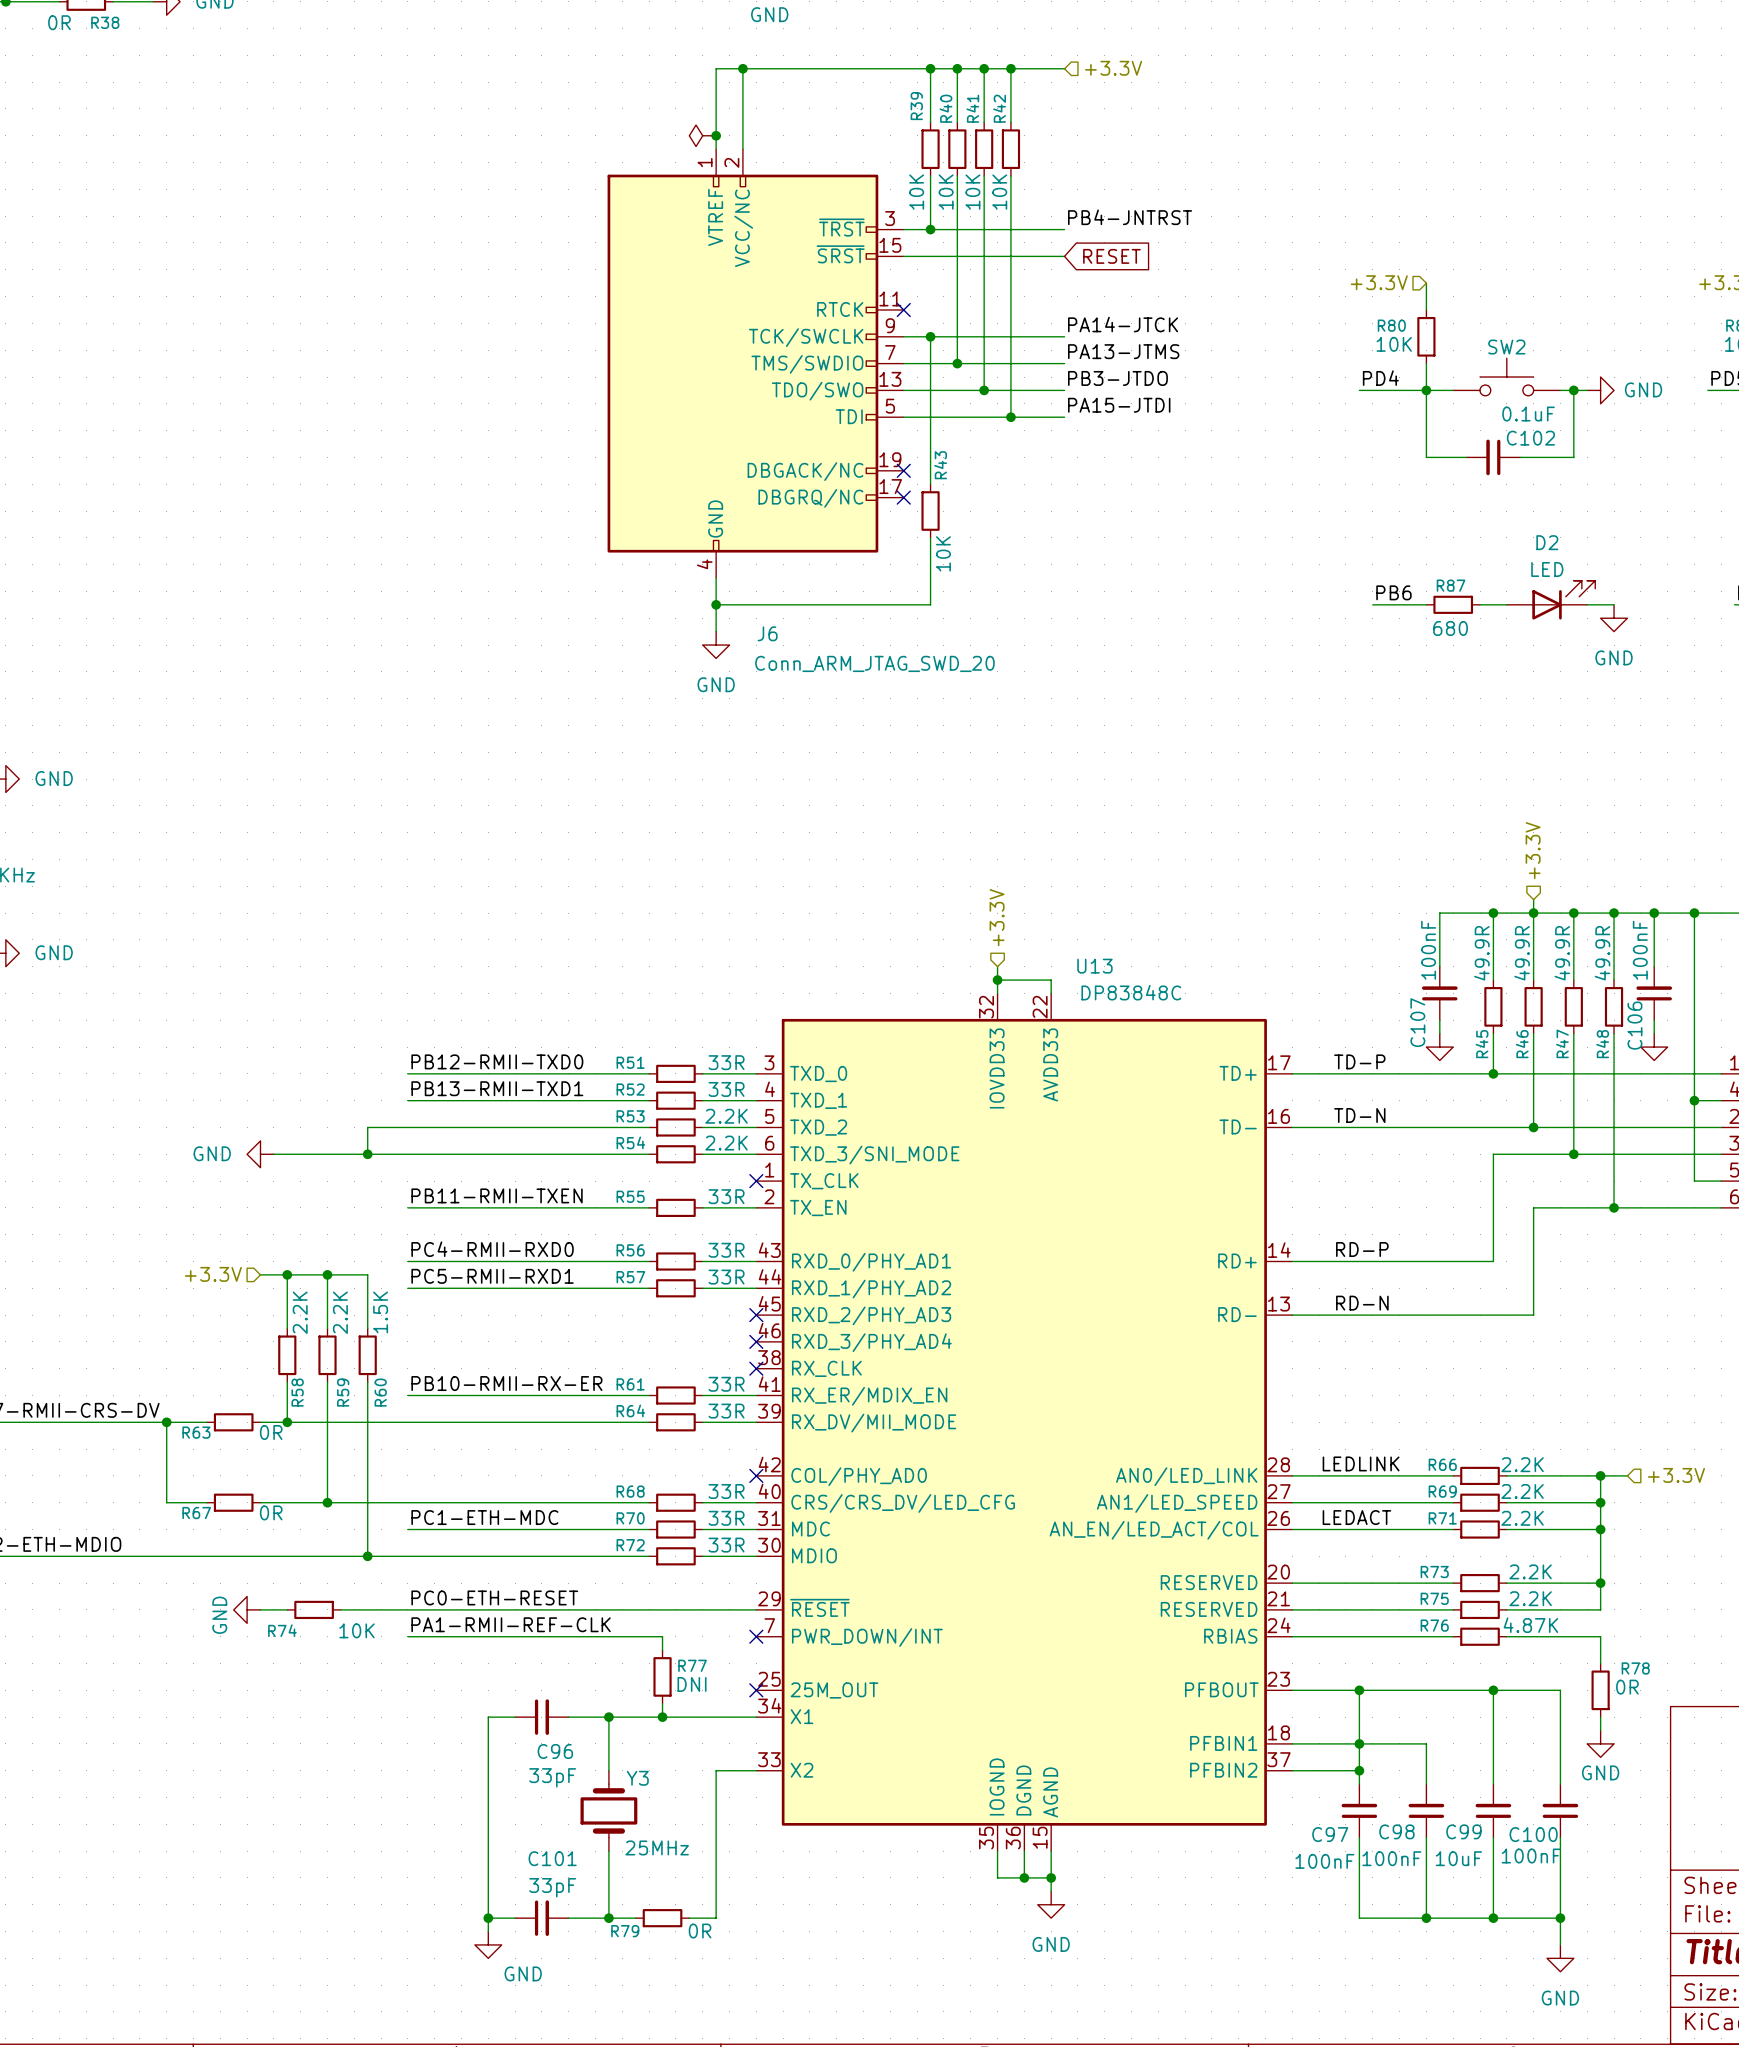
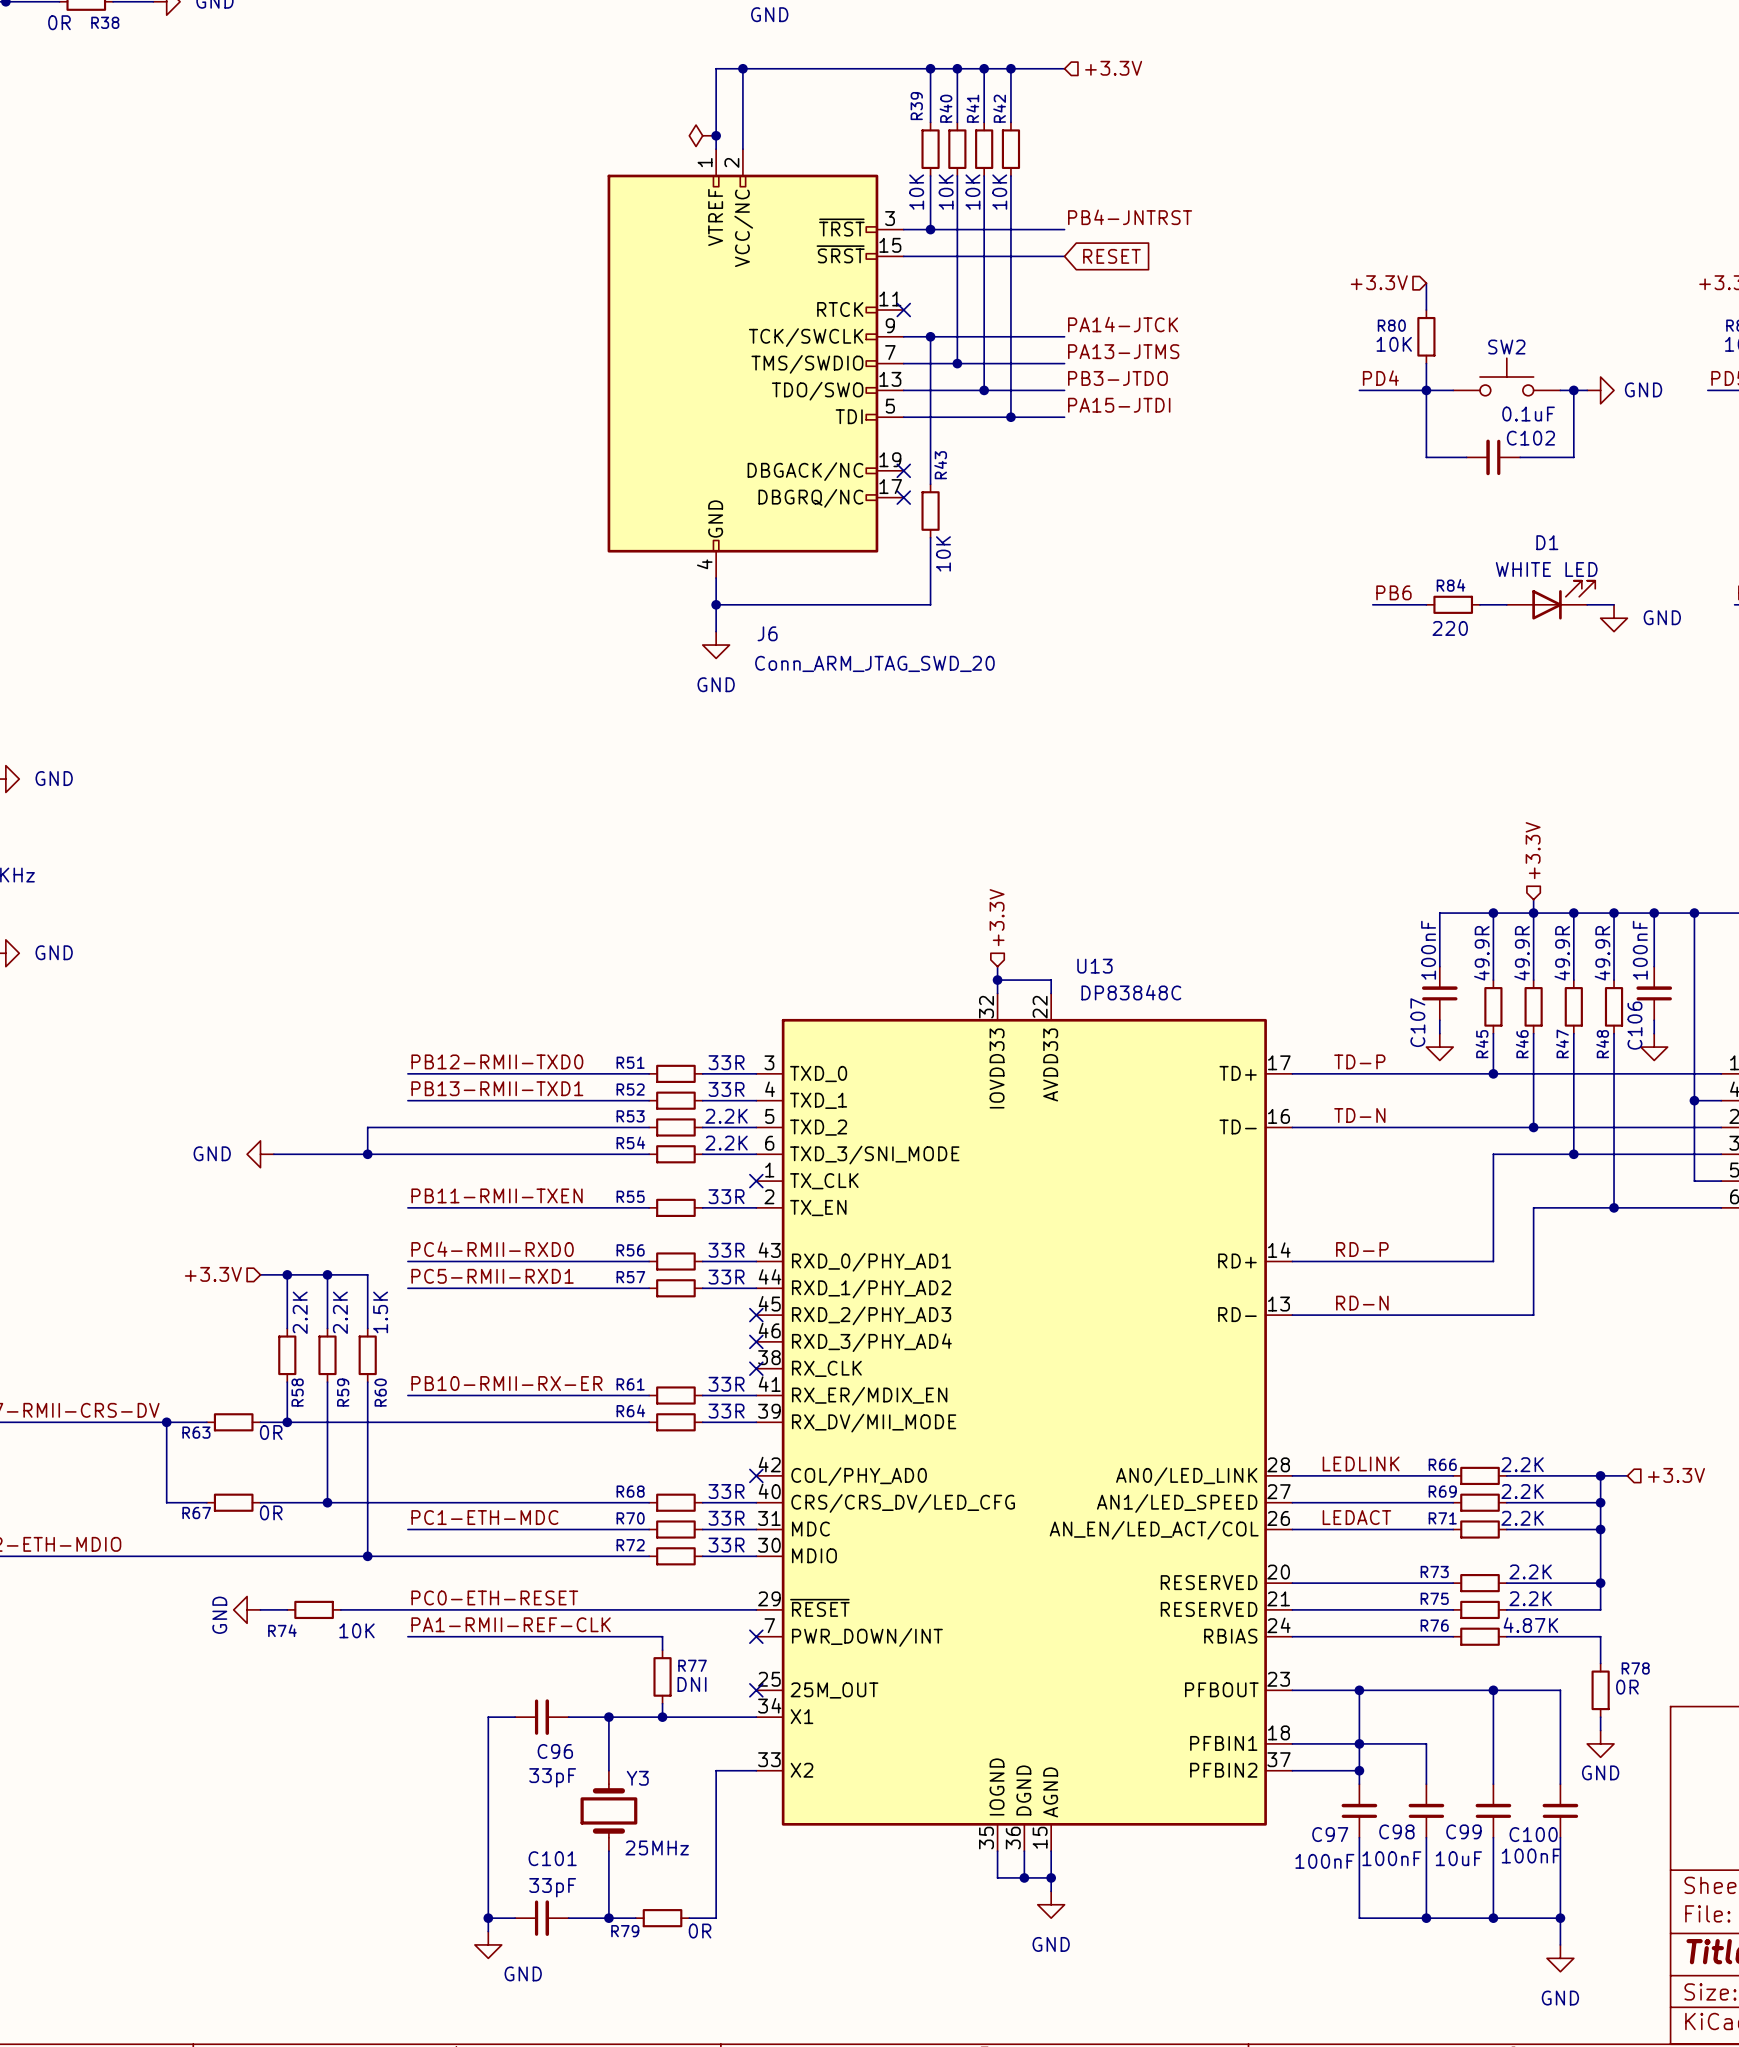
D2 name: D2 (1547, 542) -> D1 (1547, 542)
D2 value: LED (1547, 569) -> WHITE LED (1546, 569)
R87 name: R87 (1451, 585) -> R84 (1451, 585)
R87 value: 680 (1450, 628) -> 220 (1450, 628)
power symbol text position: GND (1614, 657) -> GND (1662, 617)

